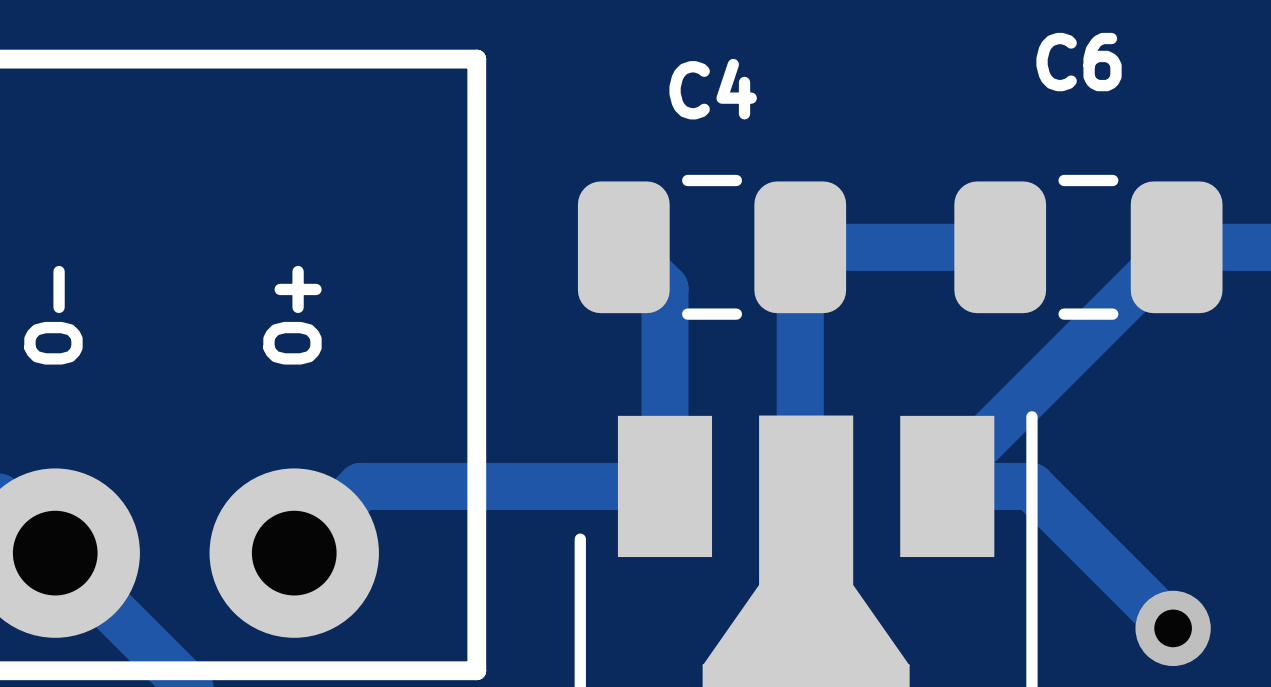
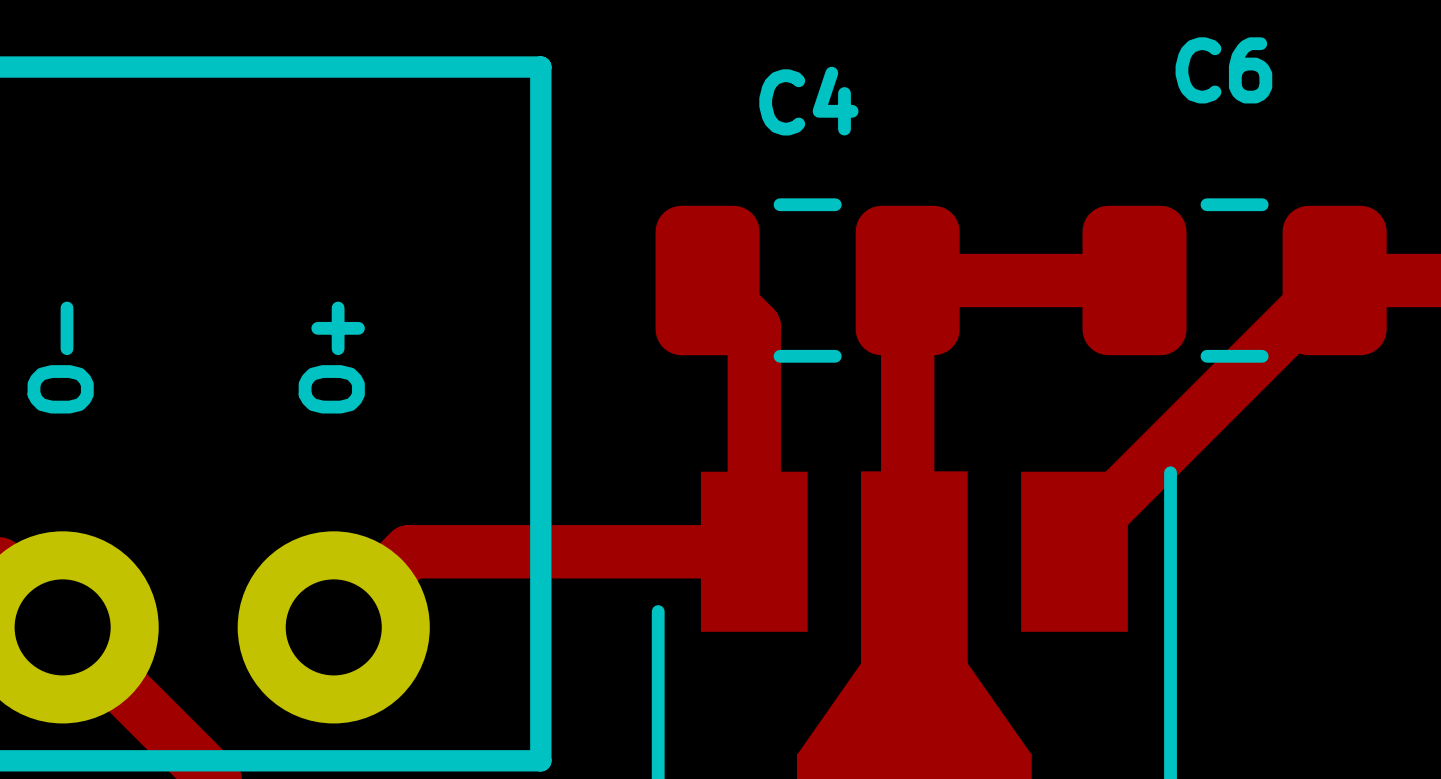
track: (947, 486) (1031, 486) (1173, 628) -> none
via: (1173, 628) -> none

